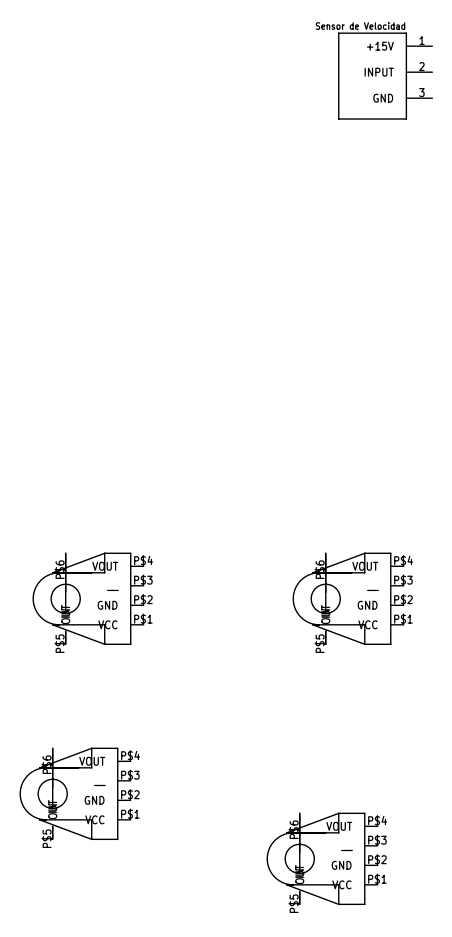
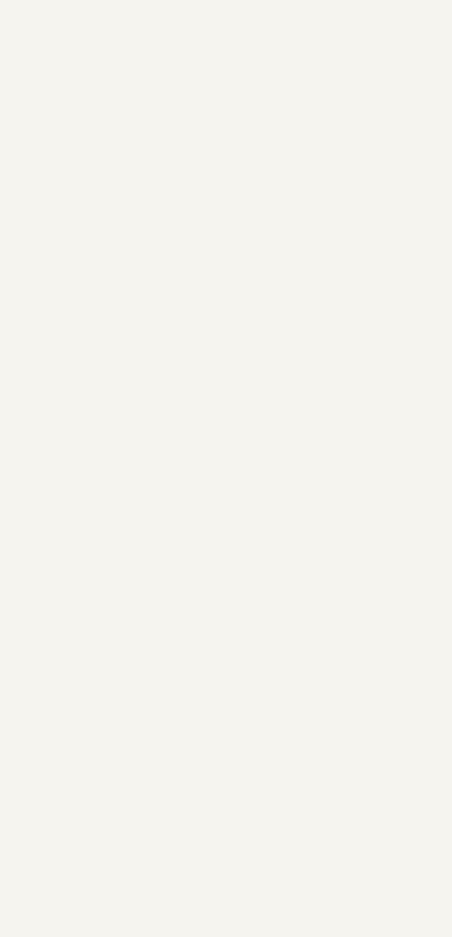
part: (385, 76) -> none
part: (88, 598) -> none
part: (348, 598) -> none
part: (75, 793) -> none
part: (322, 858) -> none

